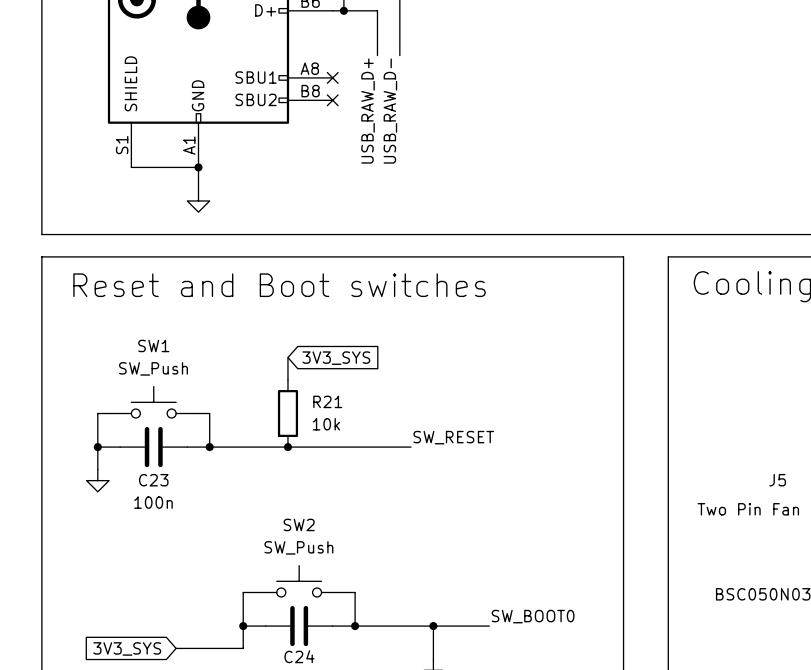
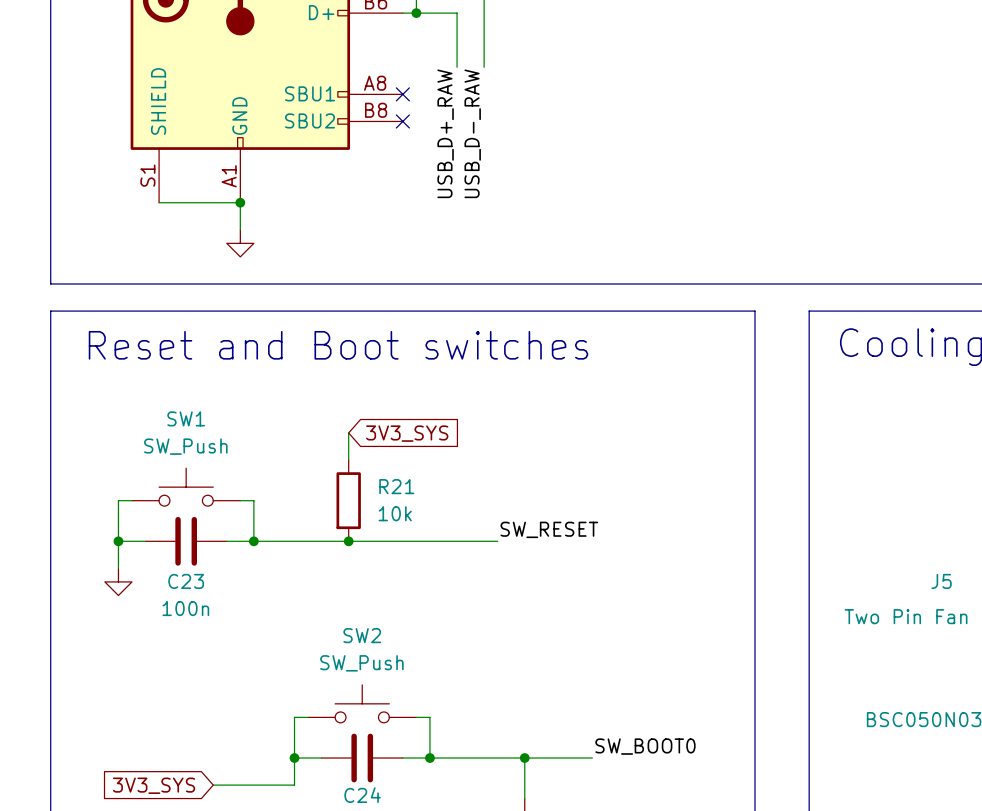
label: USB_RAW_D+ (368, 111) -> USB_D+_RAW (445, 133)
label: USB_RAW_D- (390, 111) -> USB_D-_RAW (472, 133)

